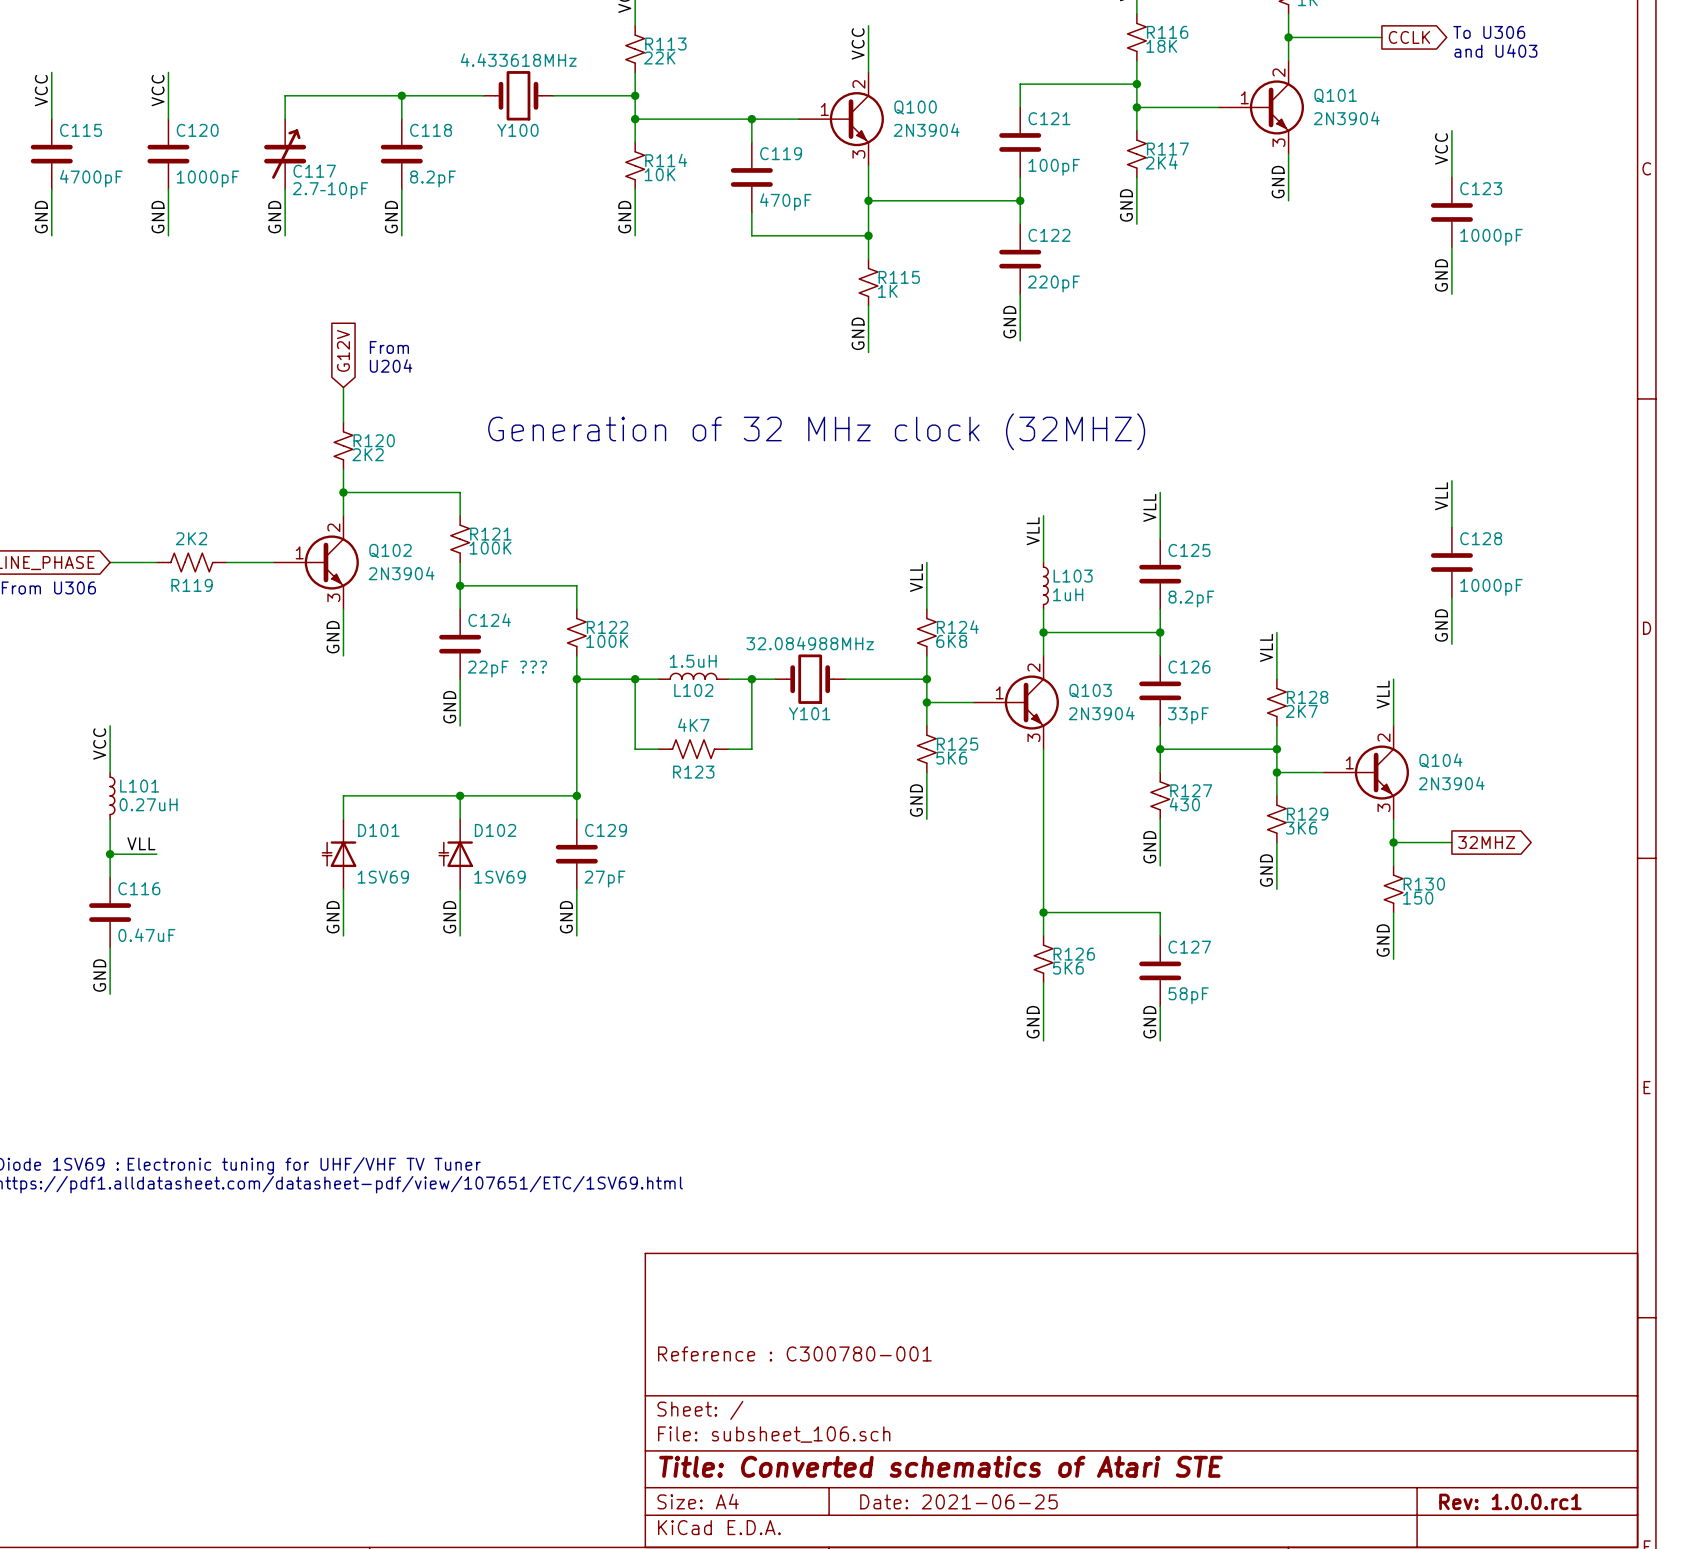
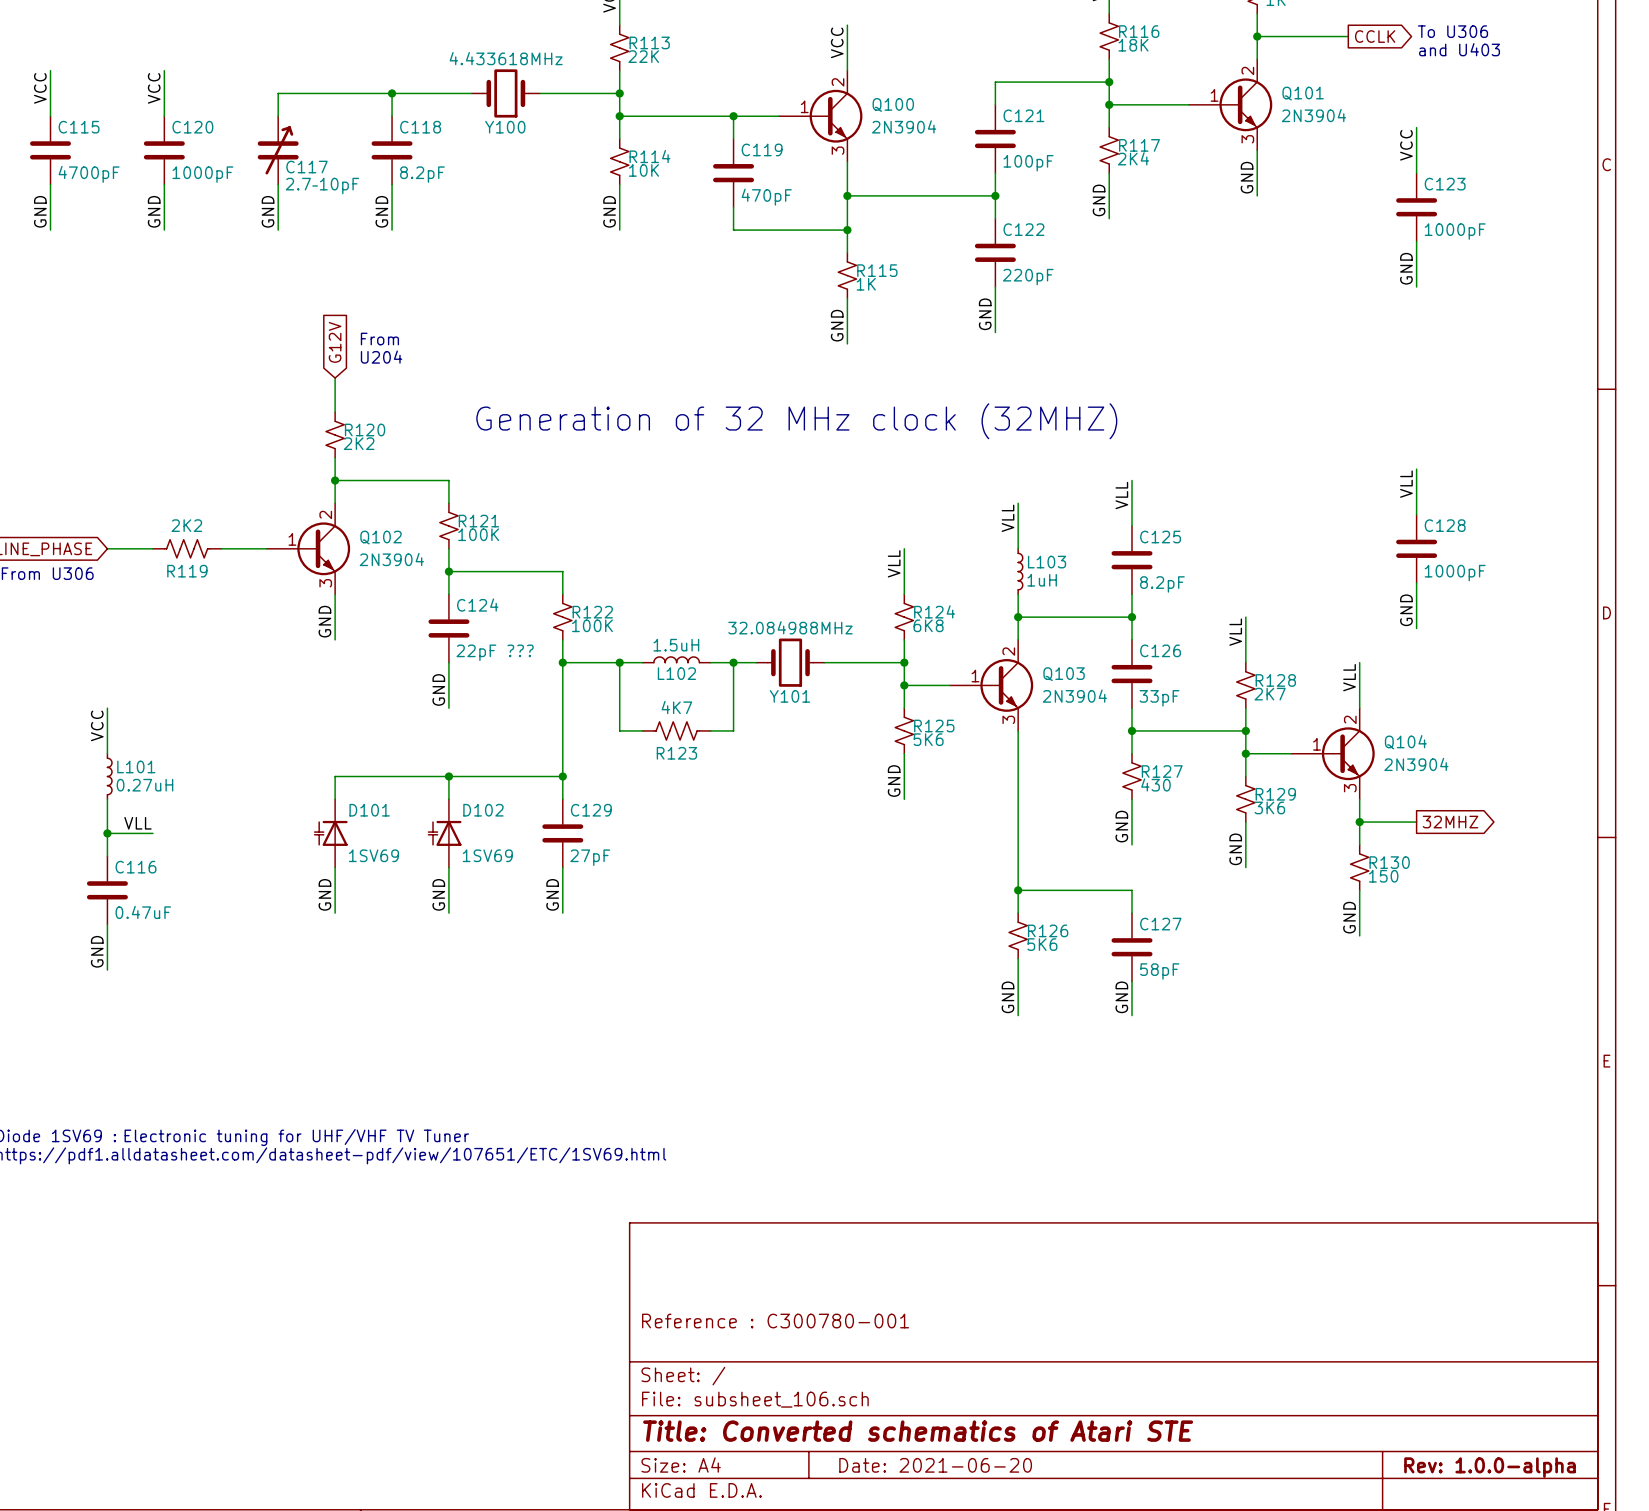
title block: Date: 2021-06-25 (958, 1501) -> Date: 2021-06-20 (935, 1465)
title block: Rev: 1.0.0.rc1 (1510, 1501) -> Rev: 1.0.0-alpha (1490, 1467)

